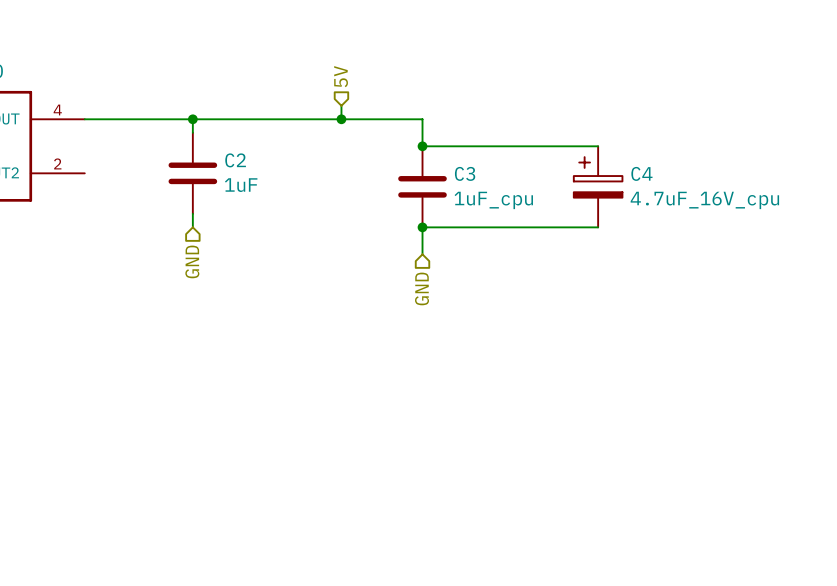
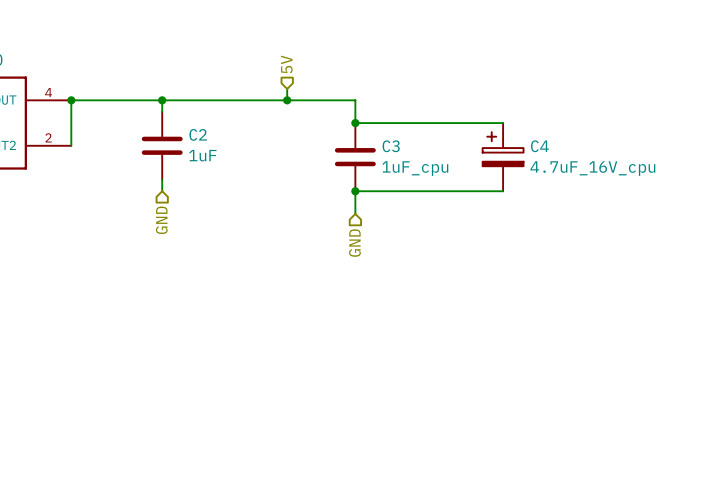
wire: none -> (71, 100) (71, 145)
junction: none -> (71, 100)

